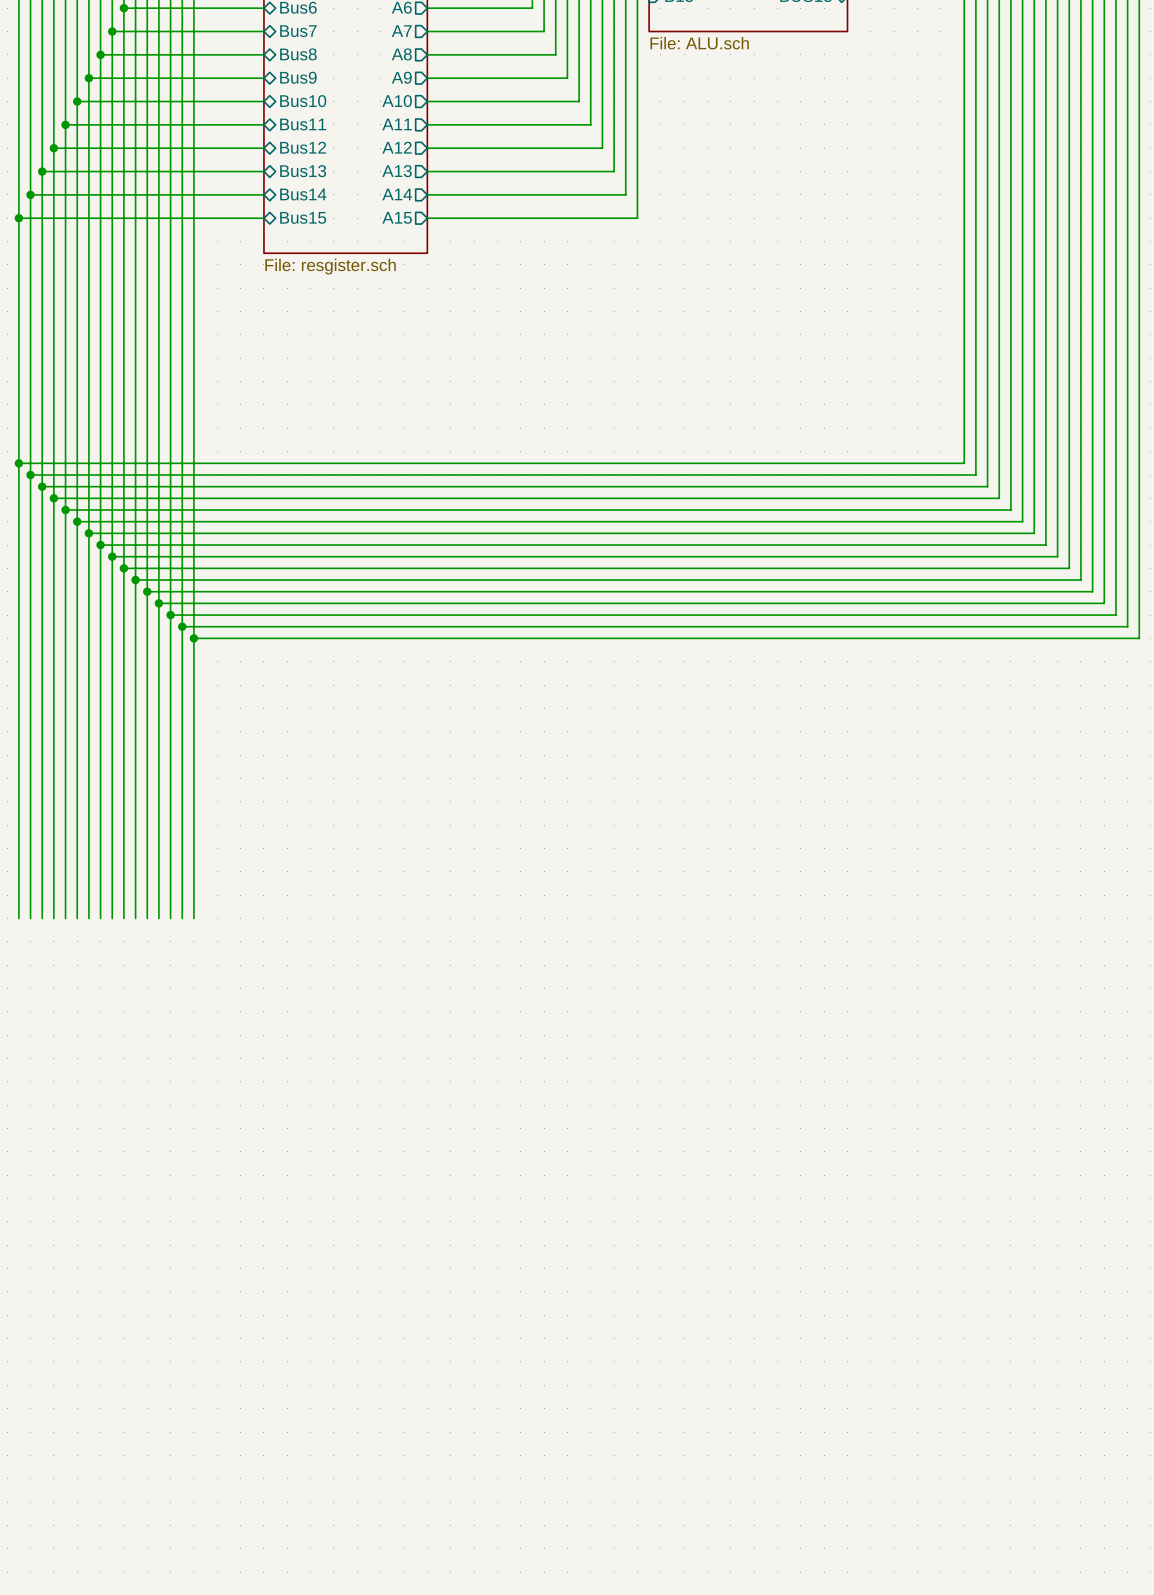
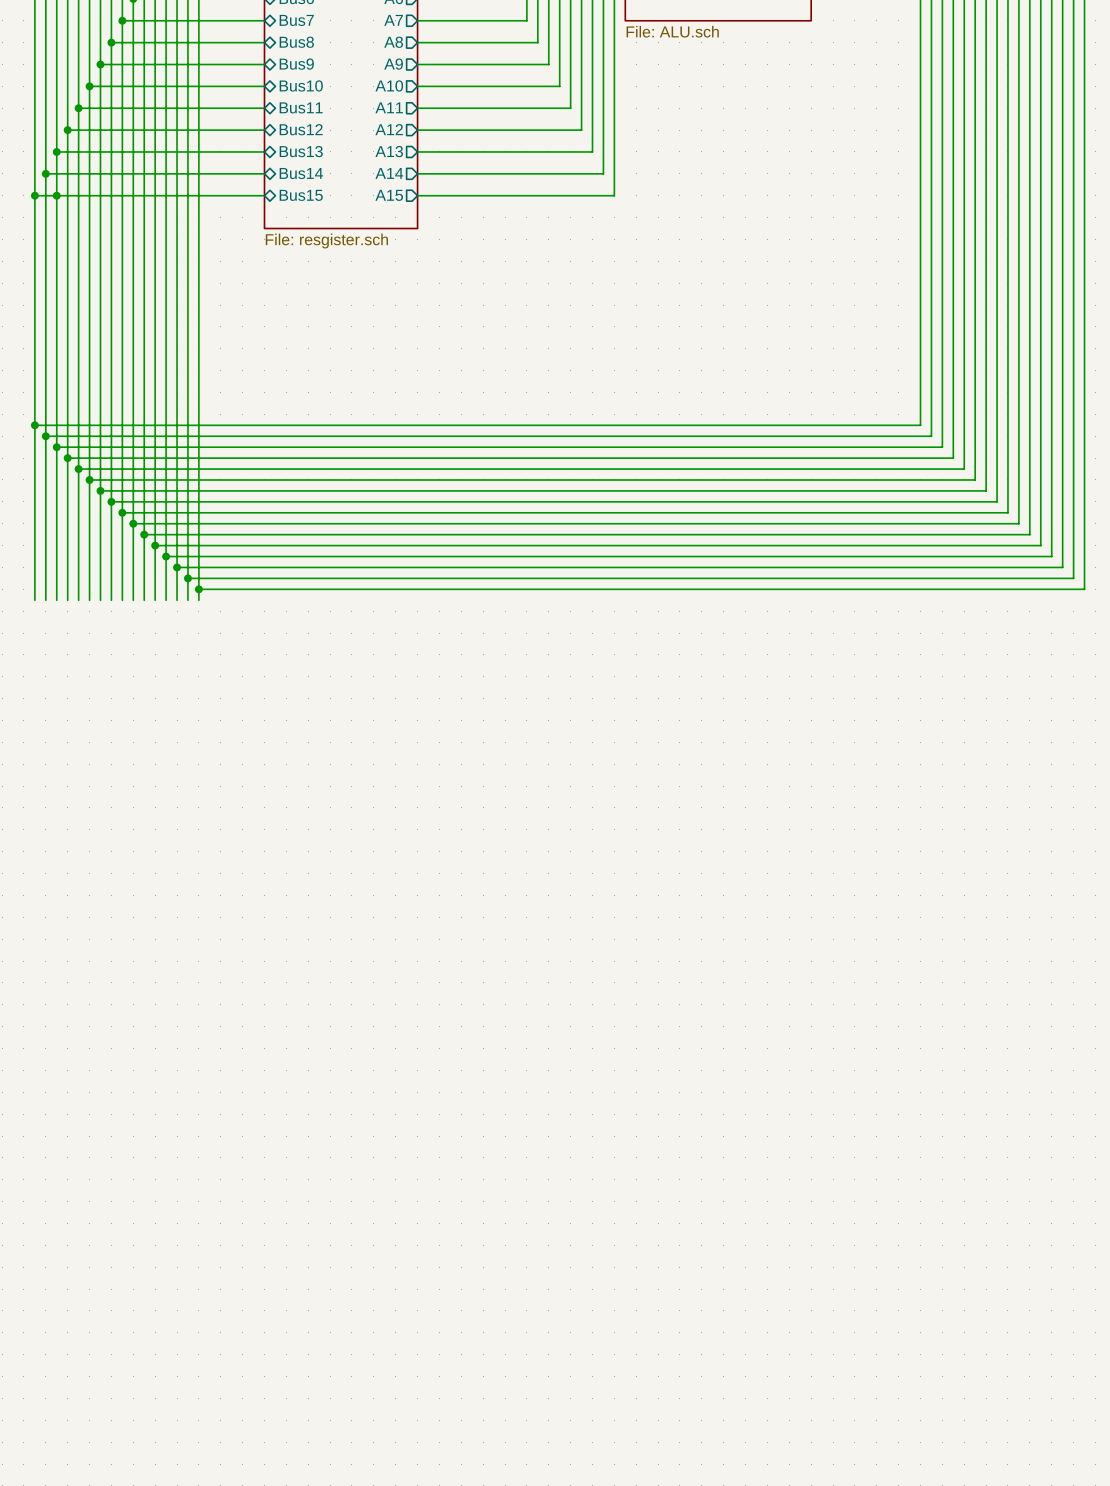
junction: none -> (56, 195)
wire: (18, 650) (18, 918) -> none
wire: (30, 650) (30, 918) -> none
wire: (42, 650) (42, 918) -> none
wire: (53, 650) (53, 918) -> none
wire: (65, 650) (65, 918) -> none
wire: (77, 650) (77, 918) -> none
wire: (88, 650) (88, 918) -> none
wire: (100, 650) (100, 918) -> none
wire: (112, 650) (112, 918) -> none
wire: (123, 650) (123, 918) -> none
wire: (135, 650) (135, 918) -> none
wire: (147, 650) (147, 918) -> none
wire: (158, 650) (158, 918) -> none
wire: (170, 650) (170, 918) -> none
wire: (182, 650) (182, 918) -> none
wire: (193, 650) (193, 918) -> none

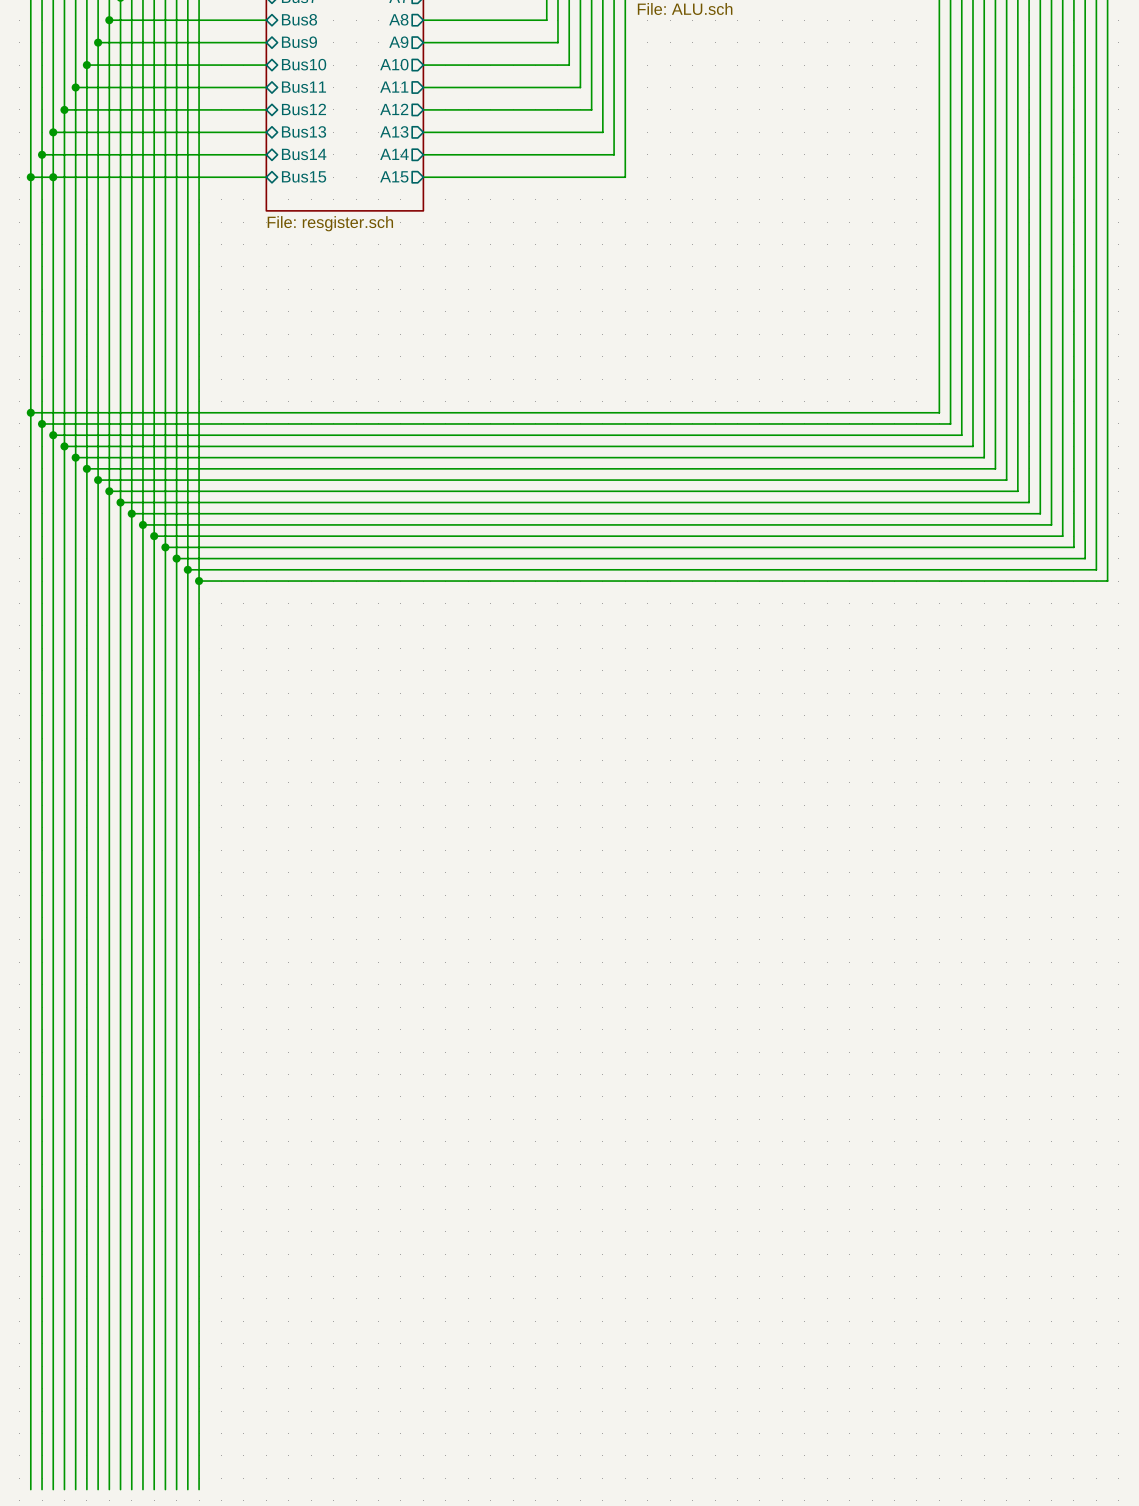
wire: none -> (30, 592) (30, 1489)
wire: none -> (42, 592) (42, 1489)
wire: none -> (53, 592) (53, 1489)
wire: none -> (64, 592) (64, 1489)
wire: none -> (75, 592) (75, 1489)
wire: none -> (86, 592) (86, 1489)
wire: none -> (98, 592) (98, 1489)
wire: none -> (109, 592) (109, 1489)
wire: none -> (120, 592) (120, 1489)
wire: none -> (131, 592) (131, 1489)
wire: none -> (142, 592) (142, 1489)
wire: none -> (154, 592) (154, 1489)
wire: none -> (165, 592) (165, 1489)
wire: none -> (176, 592) (176, 1489)
wire: none -> (187, 592) (187, 1489)
wire: none -> (199, 592) (199, 1489)

